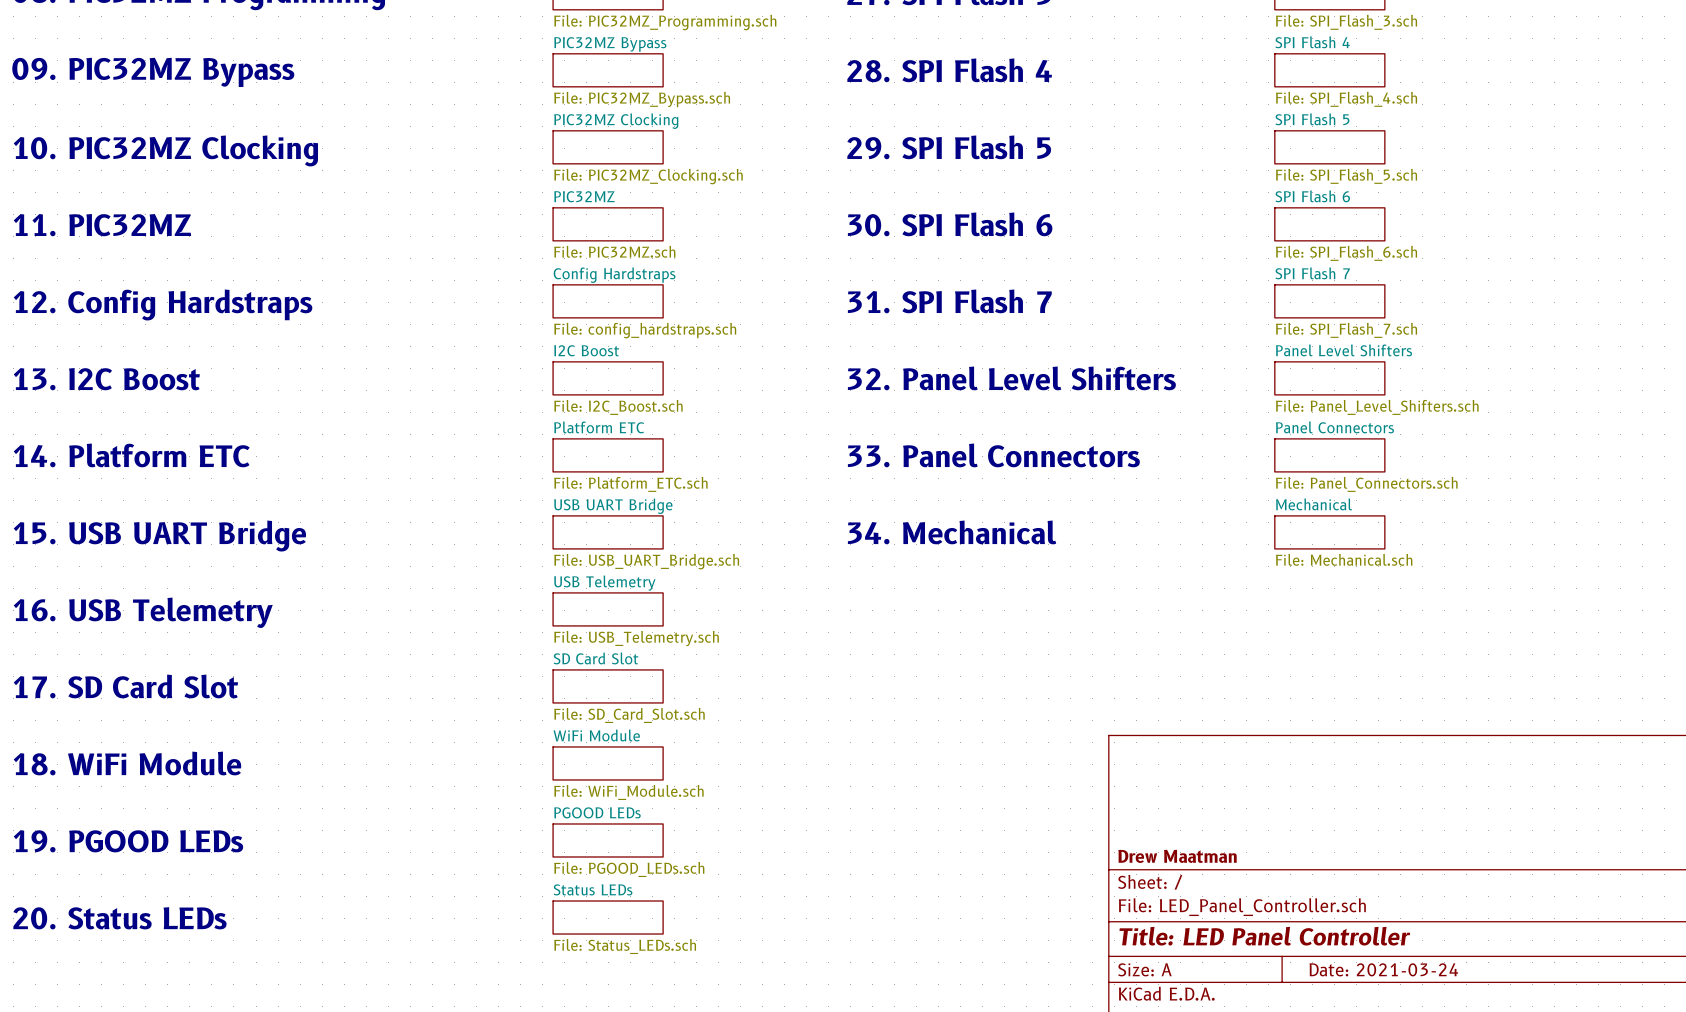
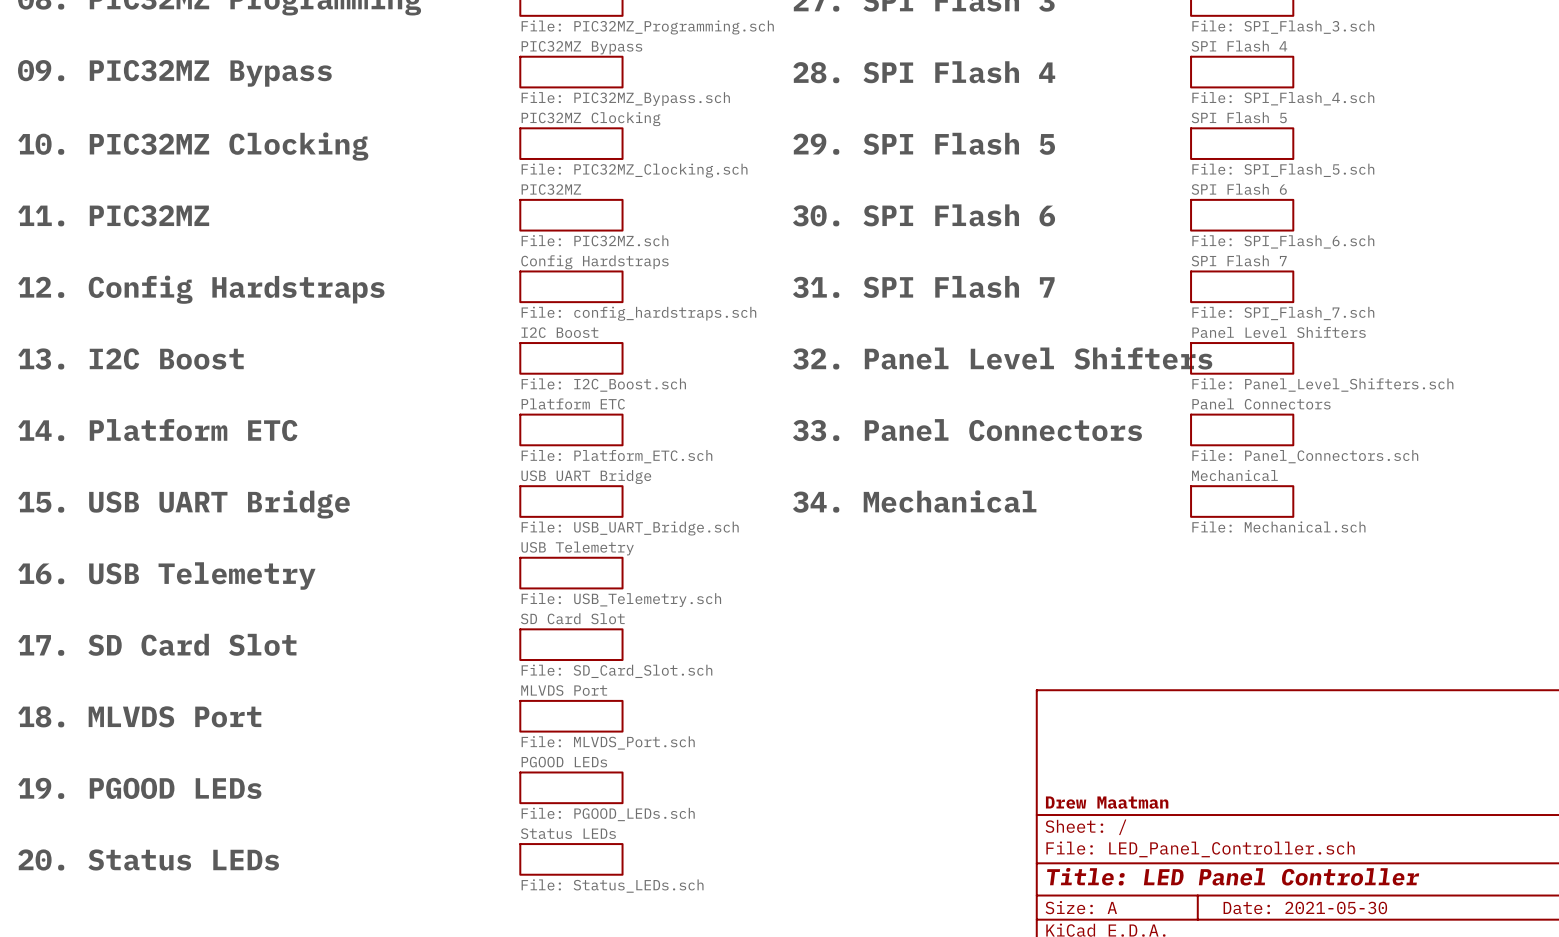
sheet WiFi Module name: WiFi Module (596, 735) -> MLVDS Port (564, 690)
text: 18. WiFi Module (127, 763) -> 18. MLVDS Port (139, 716)
sheet WiFi Module value: File: WiFi_Module.sch (628, 792) -> File: MLVDS_Port.sch (608, 742)
title block: Date: 2021-03-24 (1383, 969) -> Date: 2021-05-30 (1305, 907)

